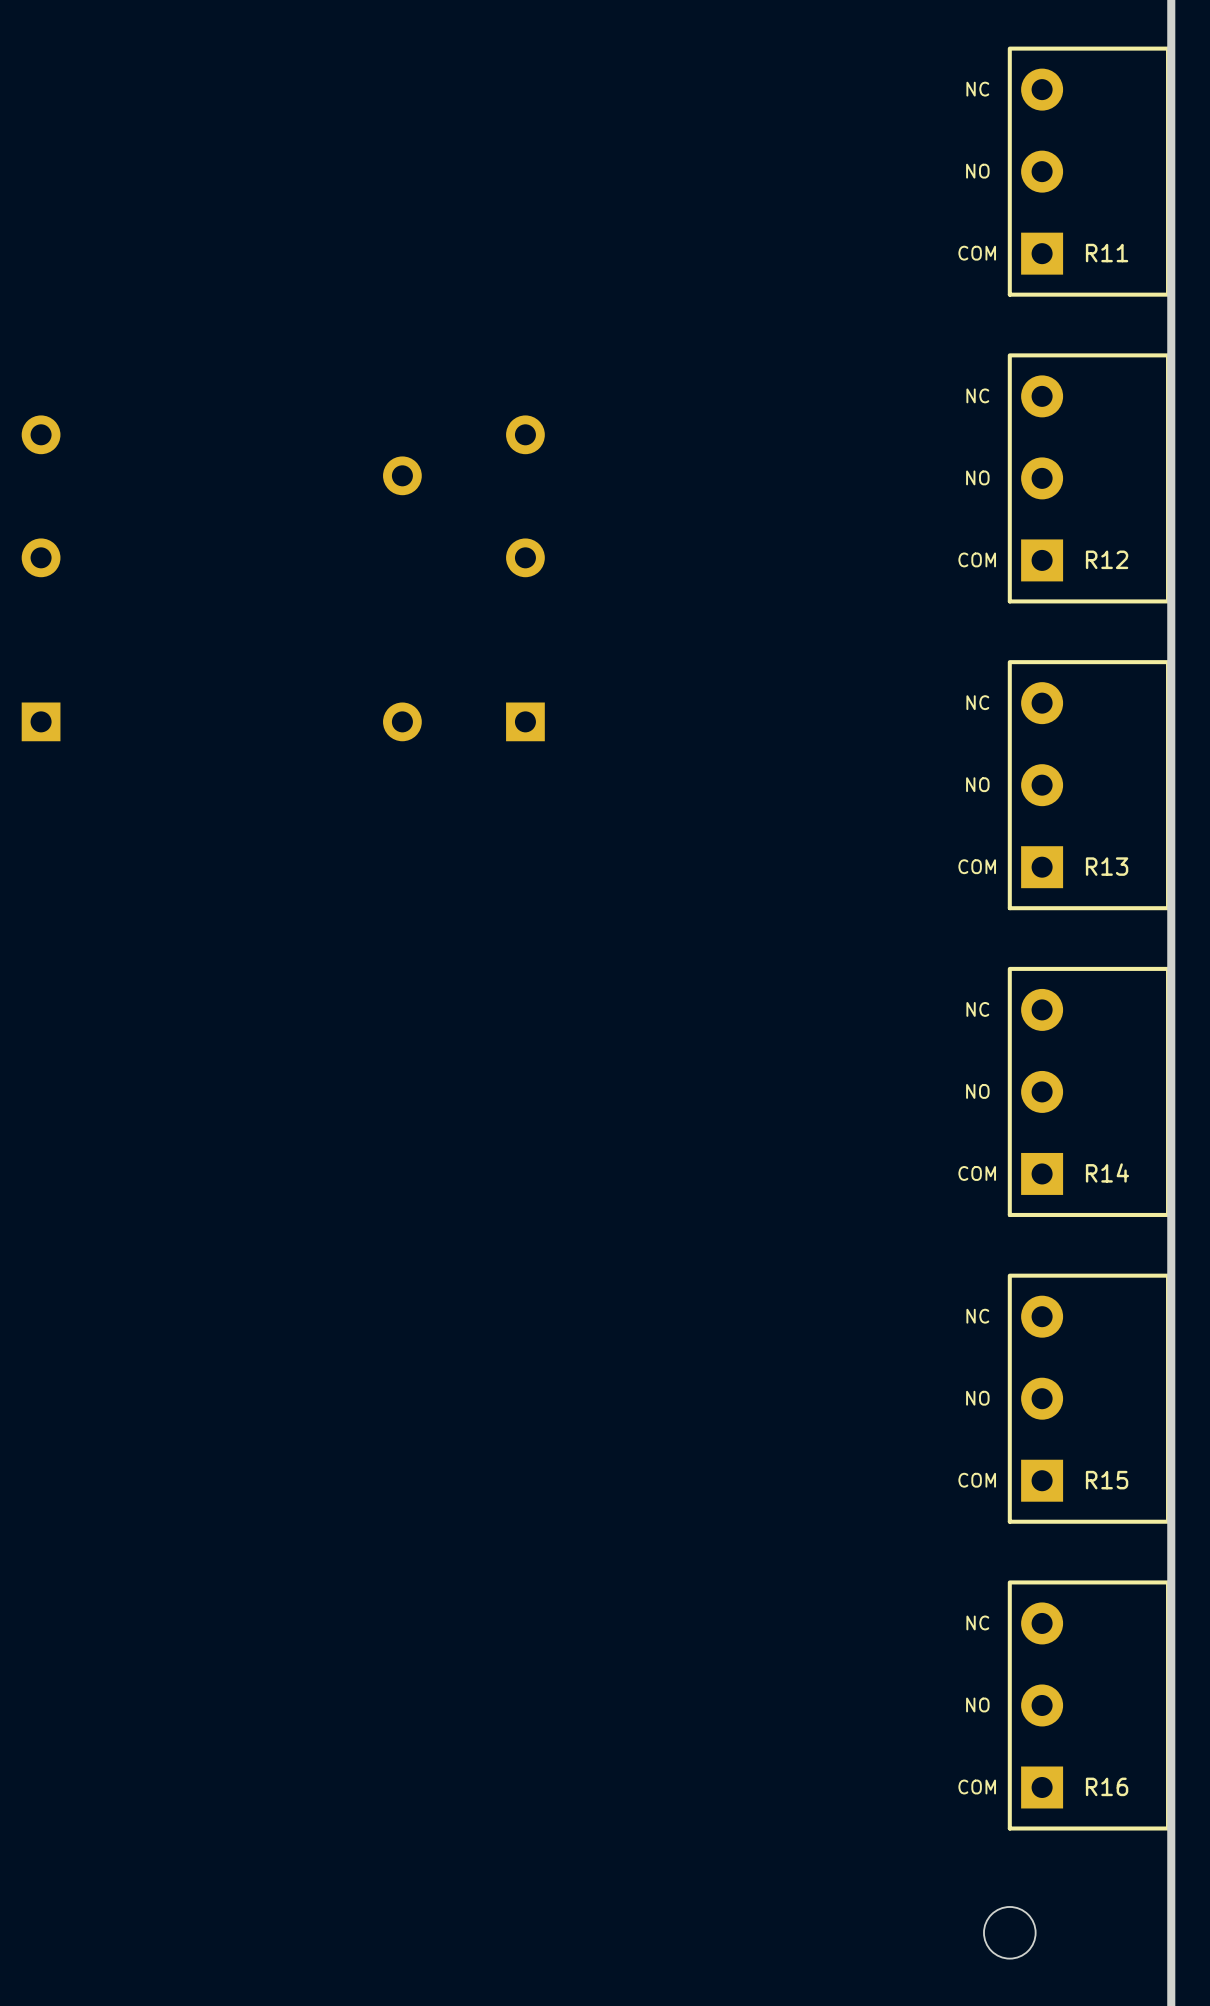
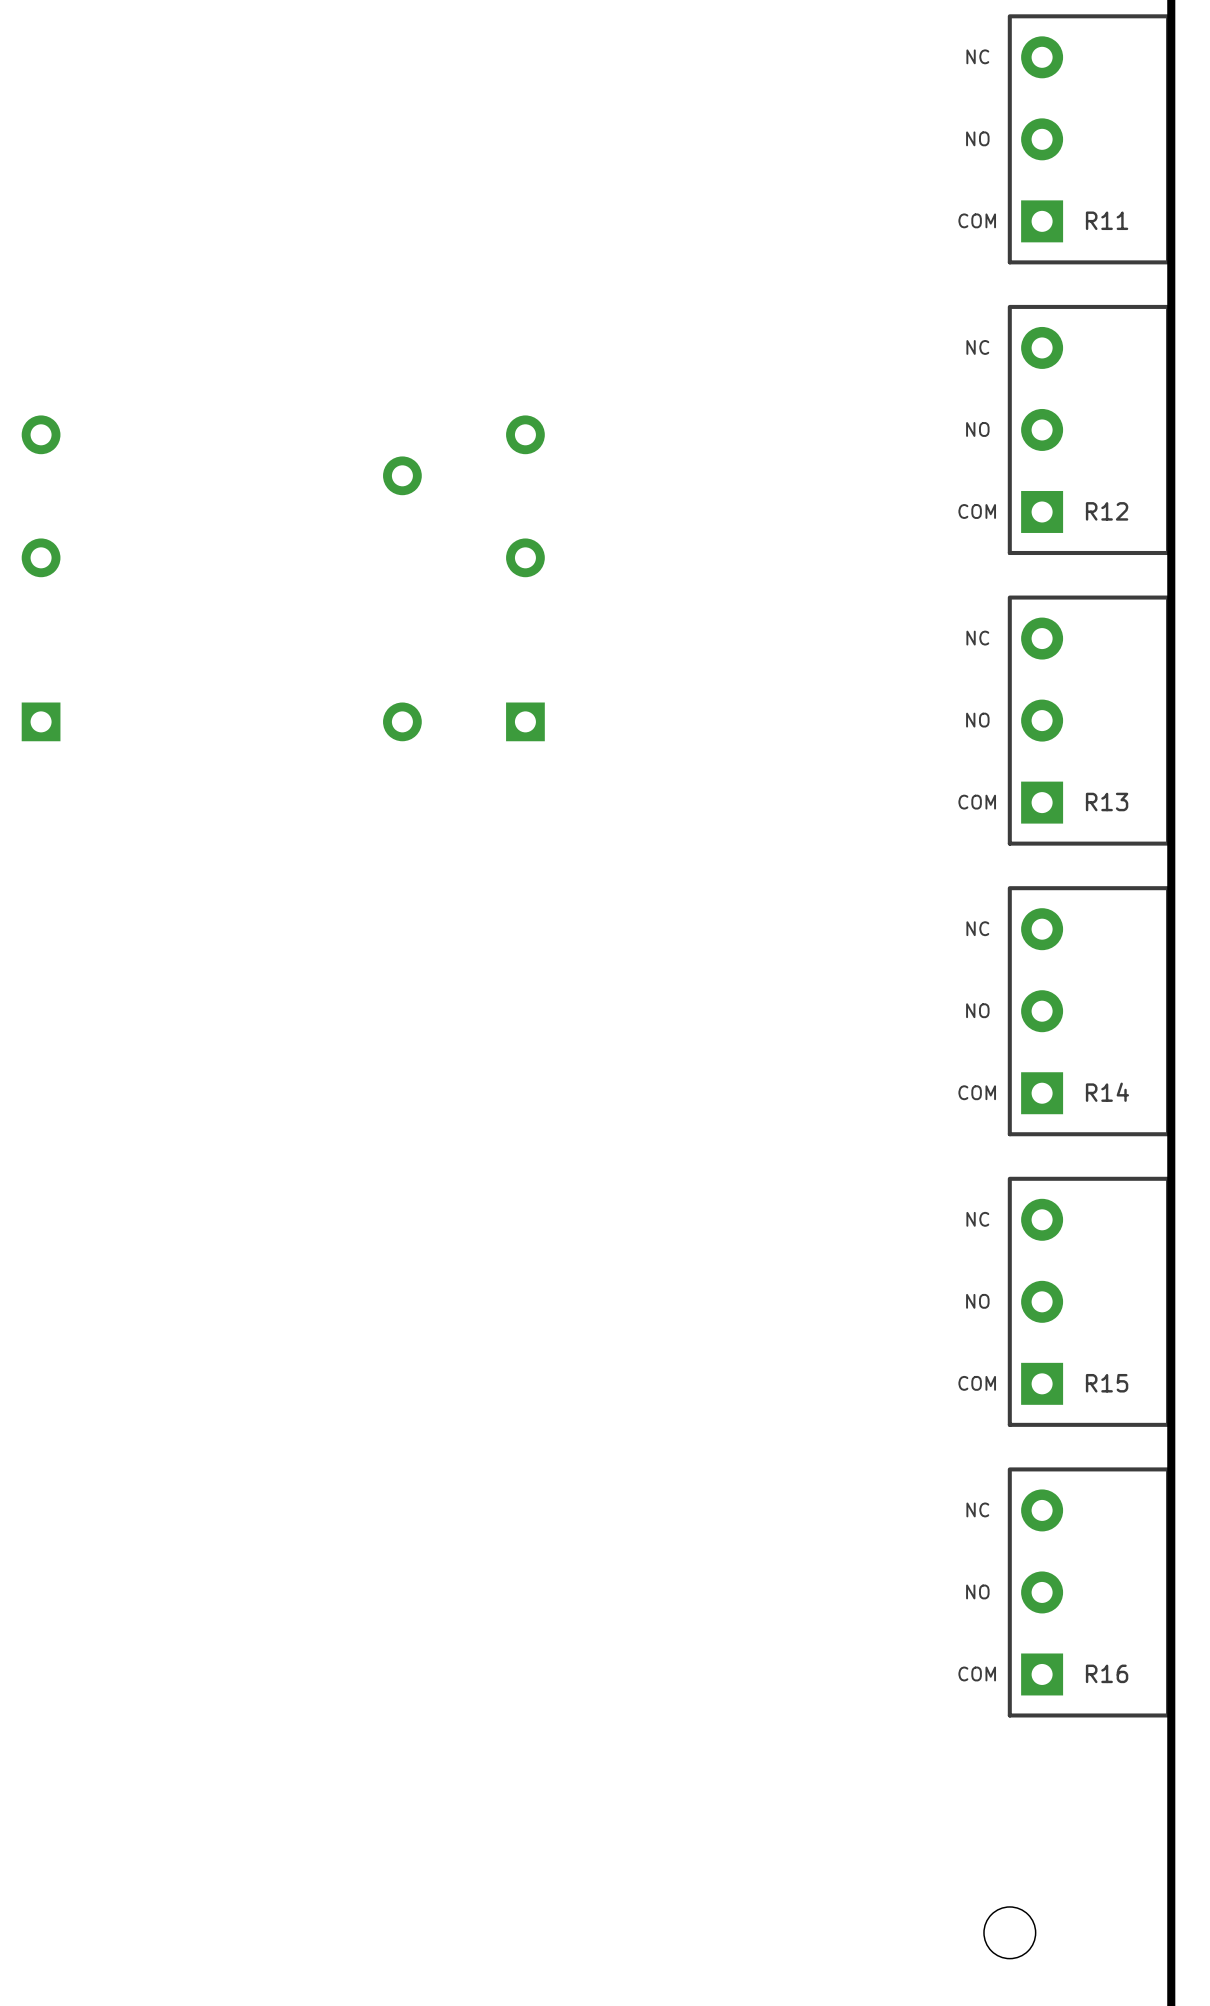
part position: (1088, 171) -> (1088, 139)
part position: (1088, 478) -> (1088, 429)
part position: (1088, 785) -> (1088, 720)
part position: (1088, 1091) -> (1088, 1011)
part position: (1088, 1398) -> (1088, 1301)
part position: (1088, 1705) -> (1088, 1592)

